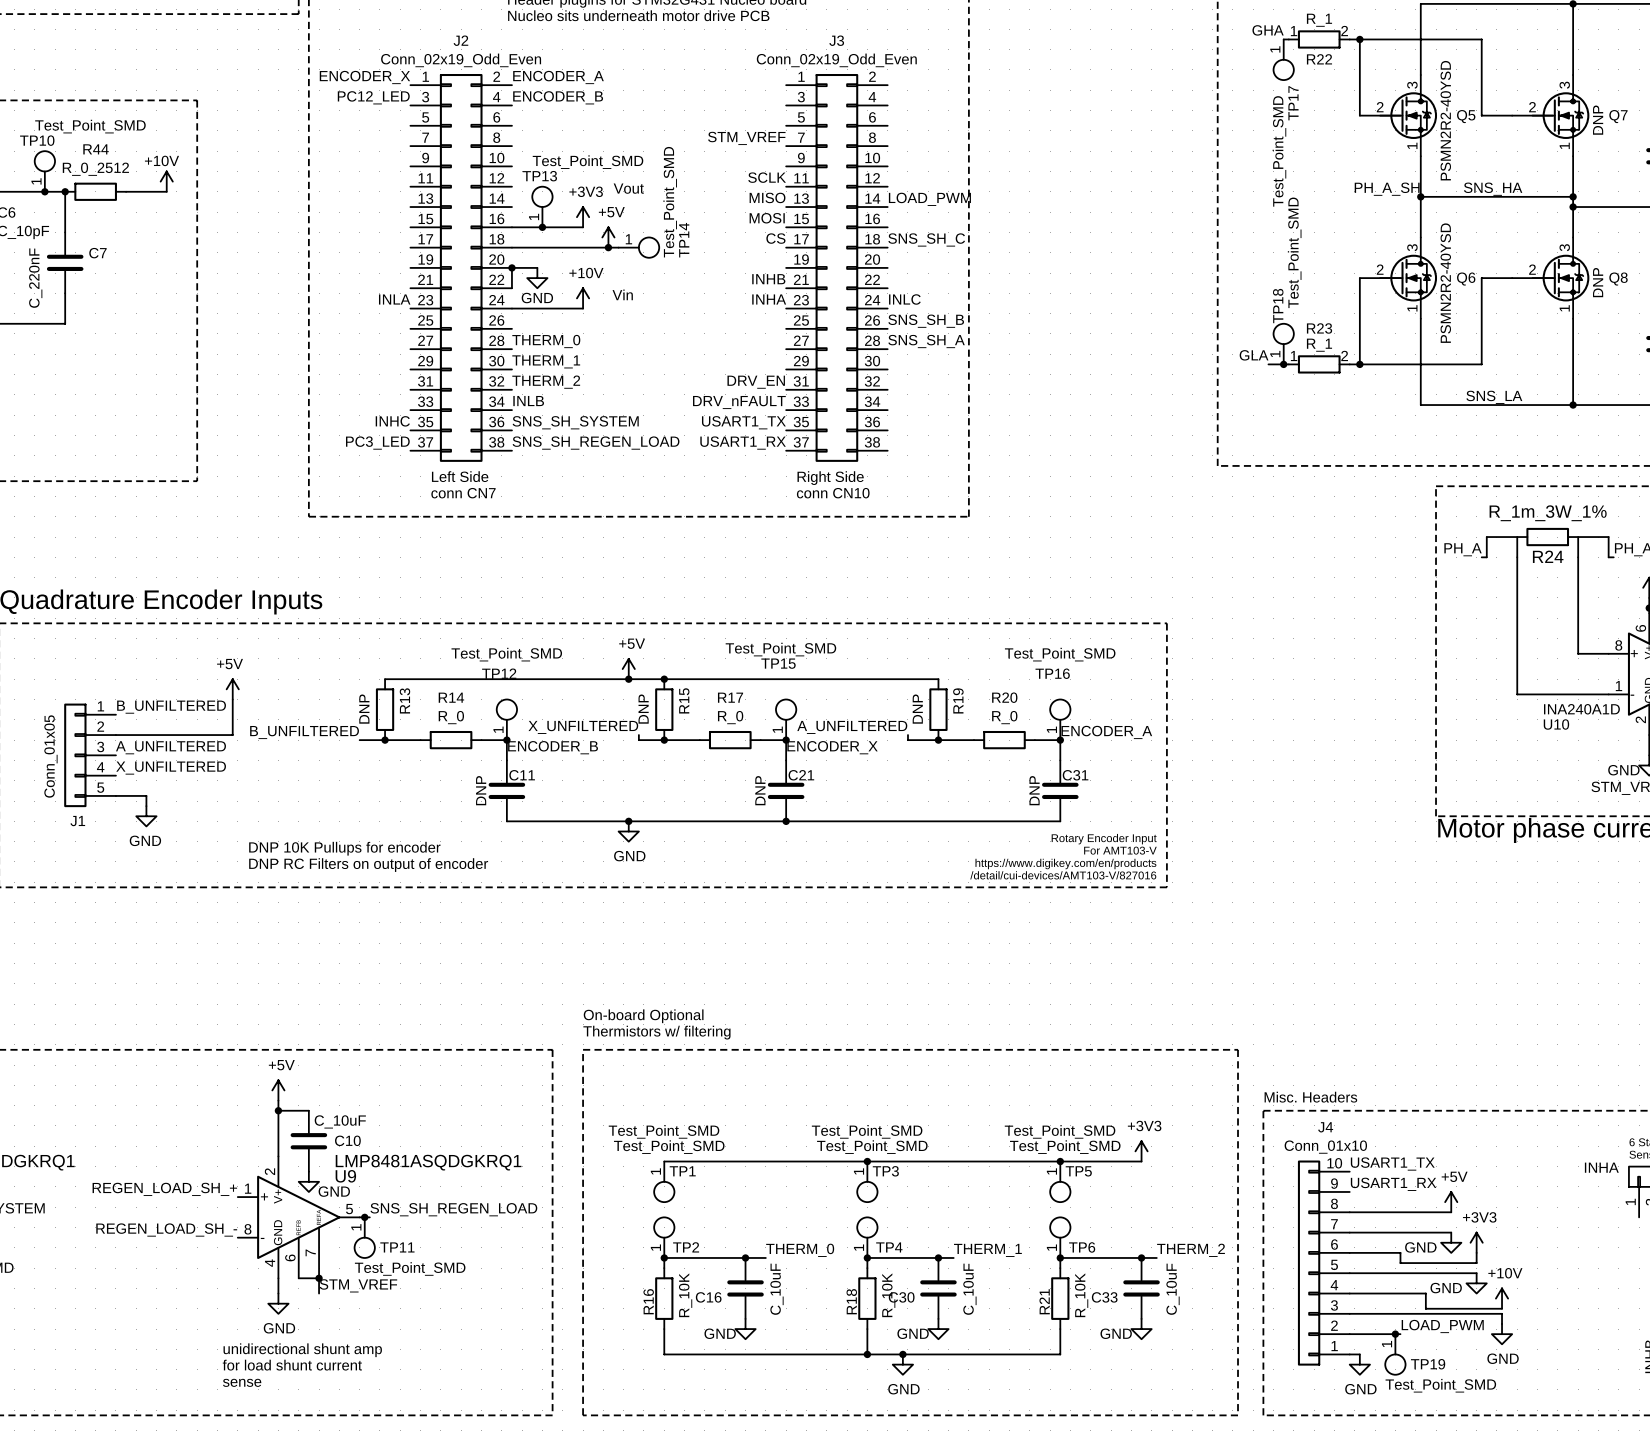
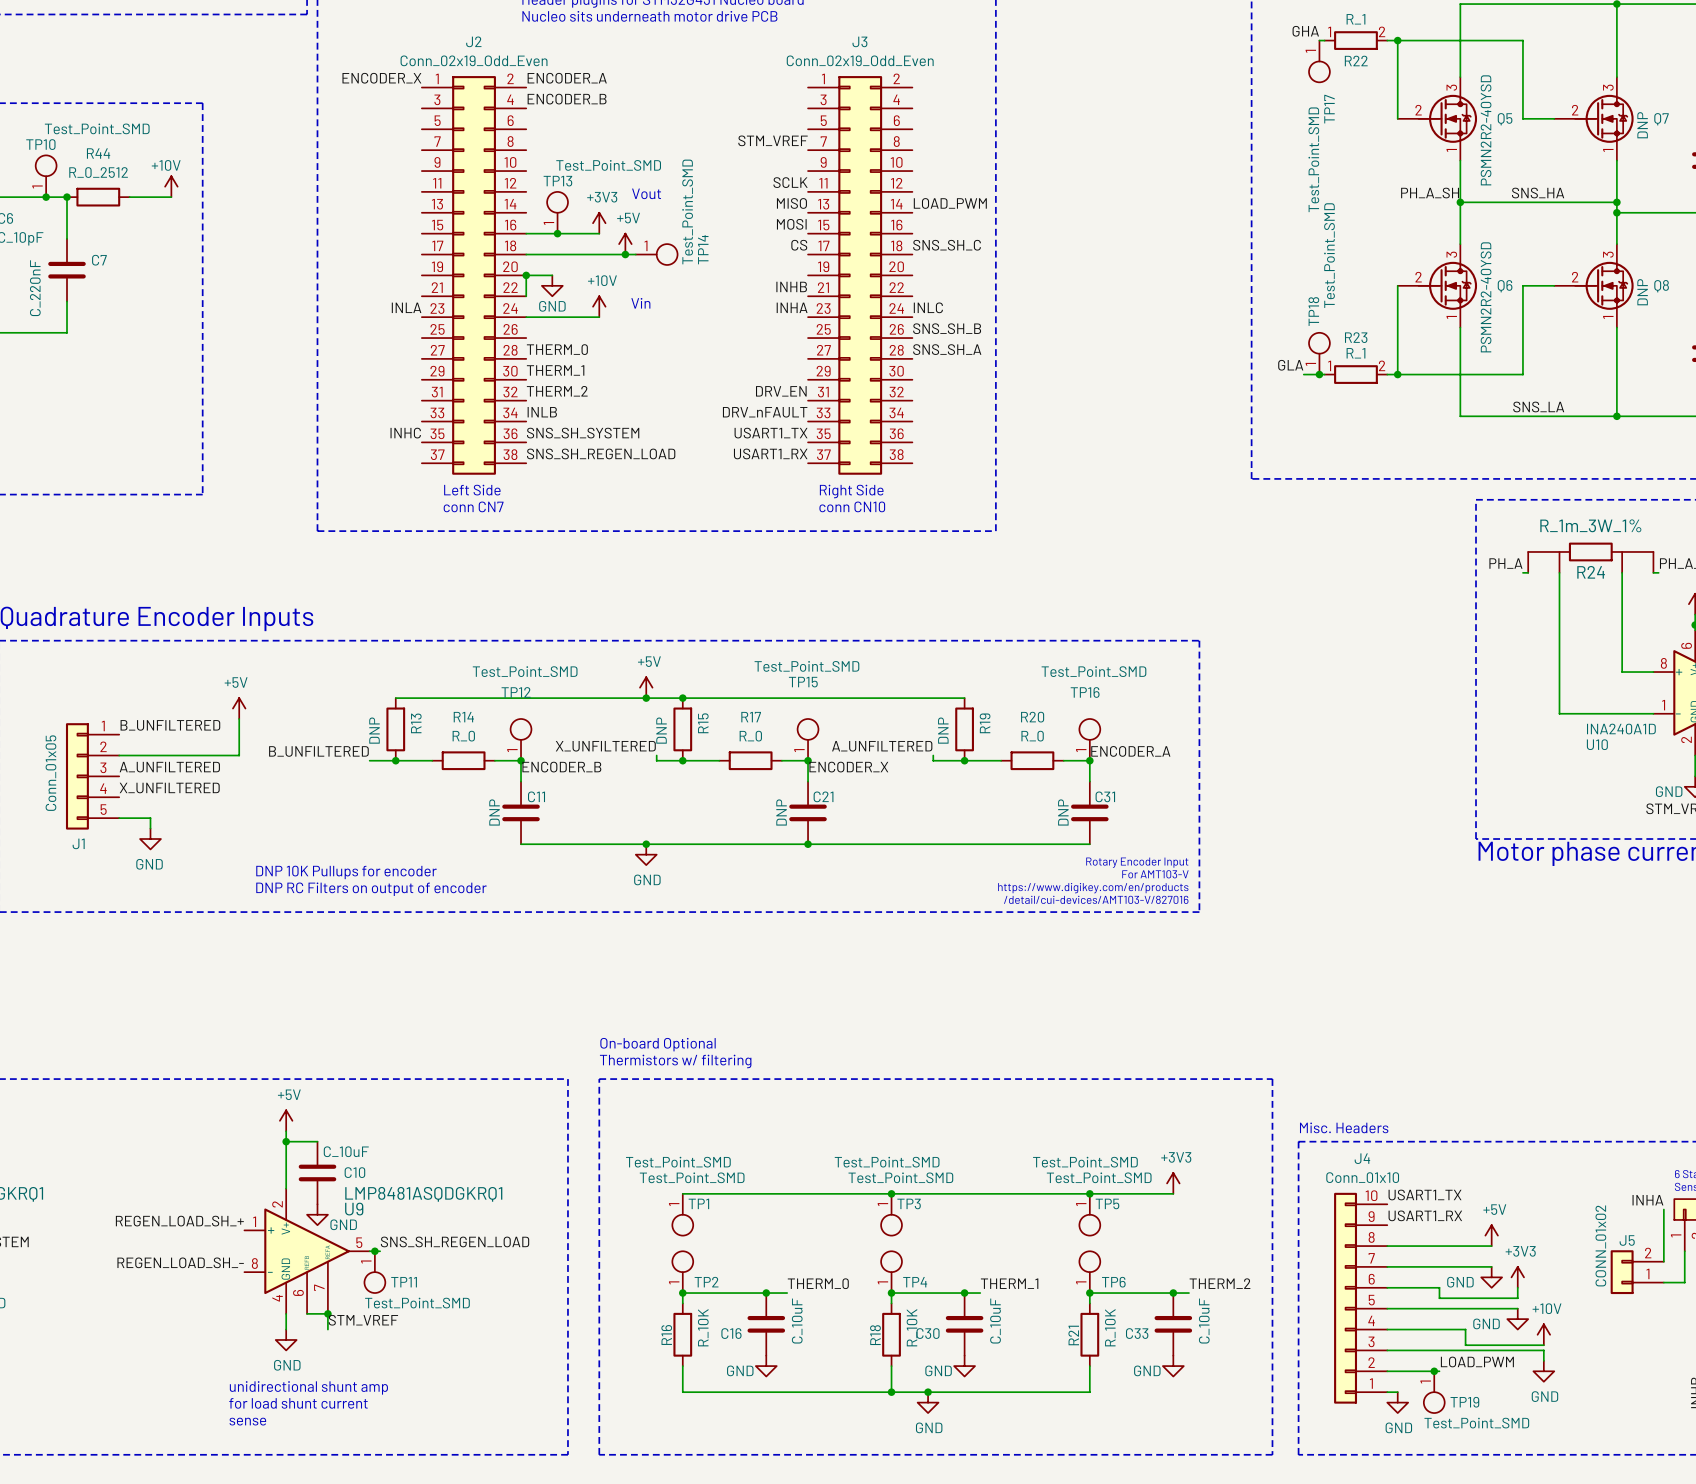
label: PC12_LED (373, 97) -> none
label: PC3_LED (377, 443) -> none
wire: none -> (1663, 1209) (1663, 1261)
wire: none -> (1684, 1251) (1684, 1282) (1663, 1282)
J5: none -> CONN_01x02 (1637, 1272)

